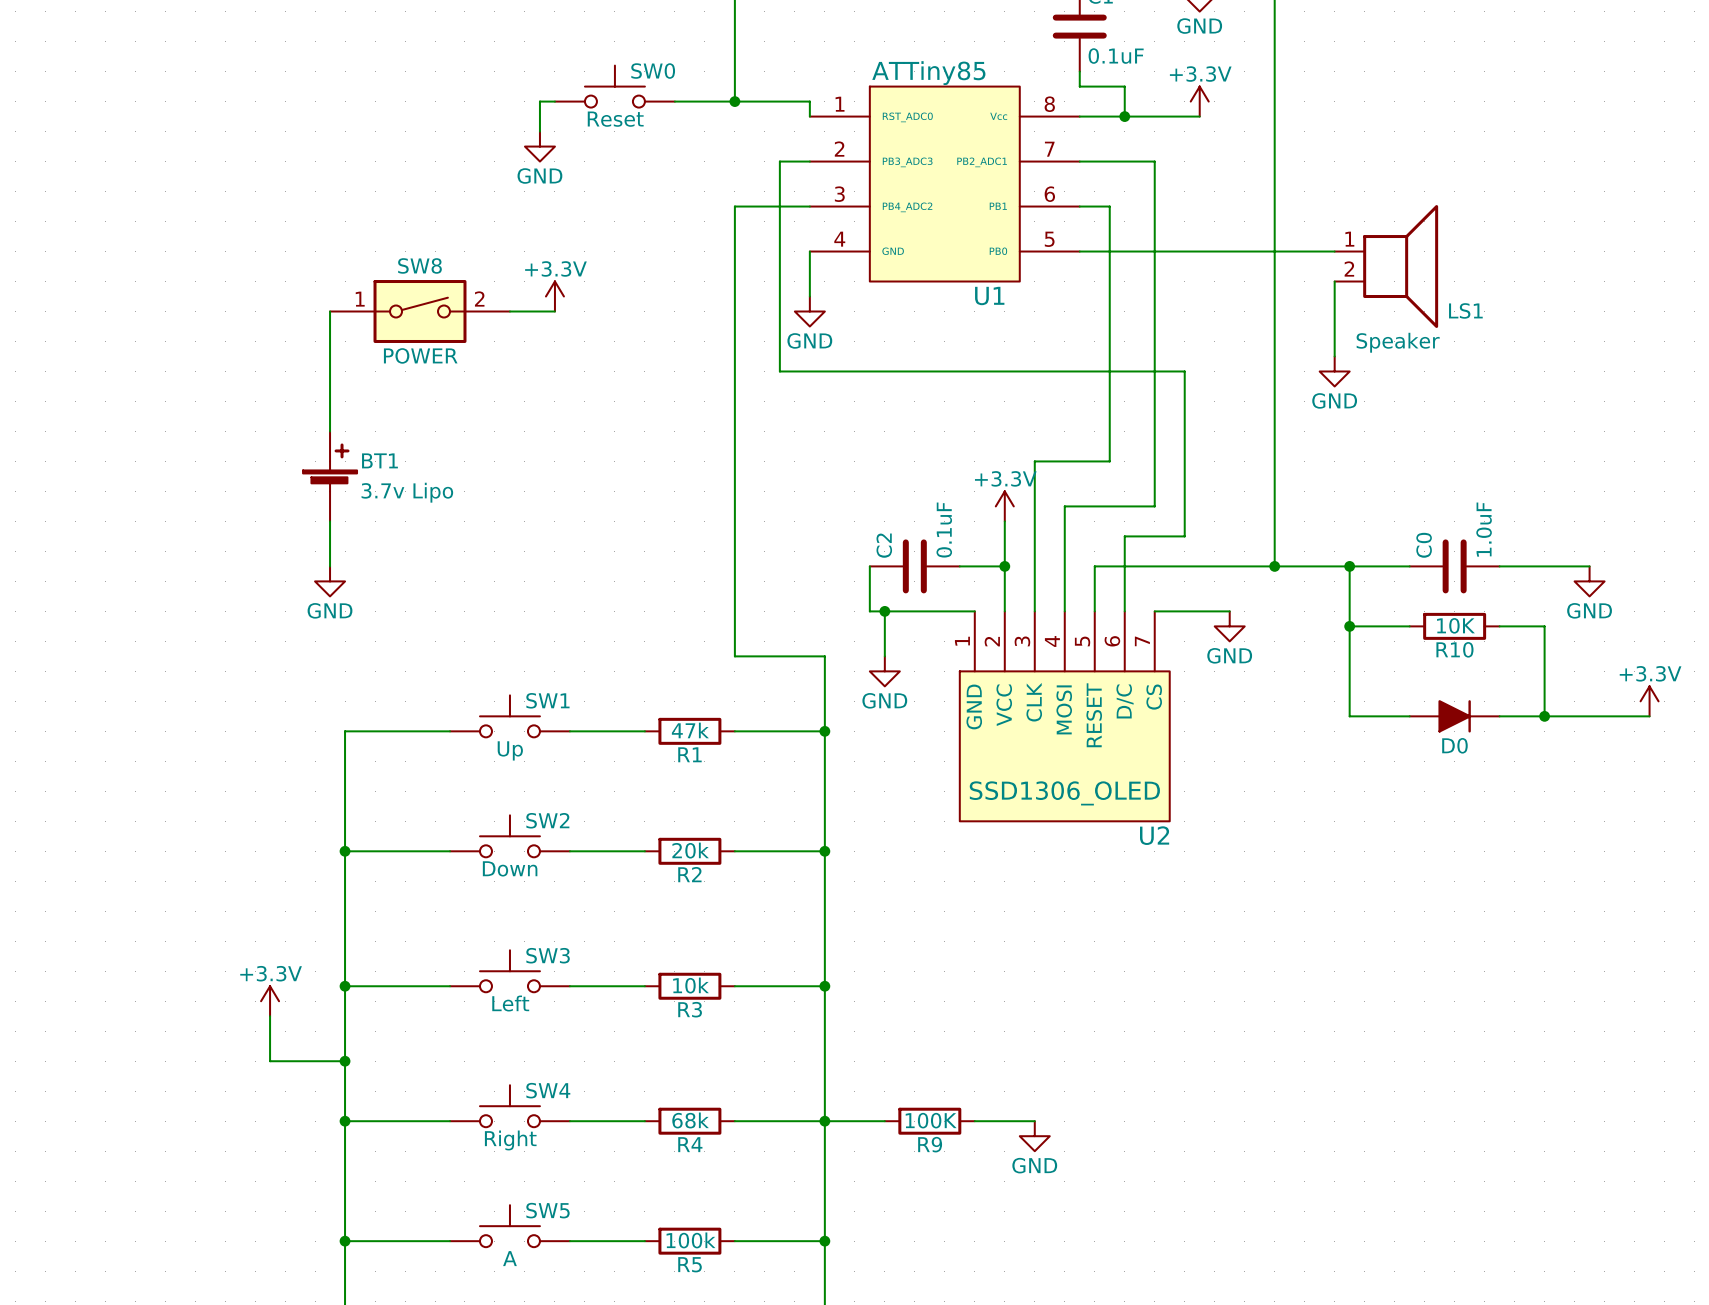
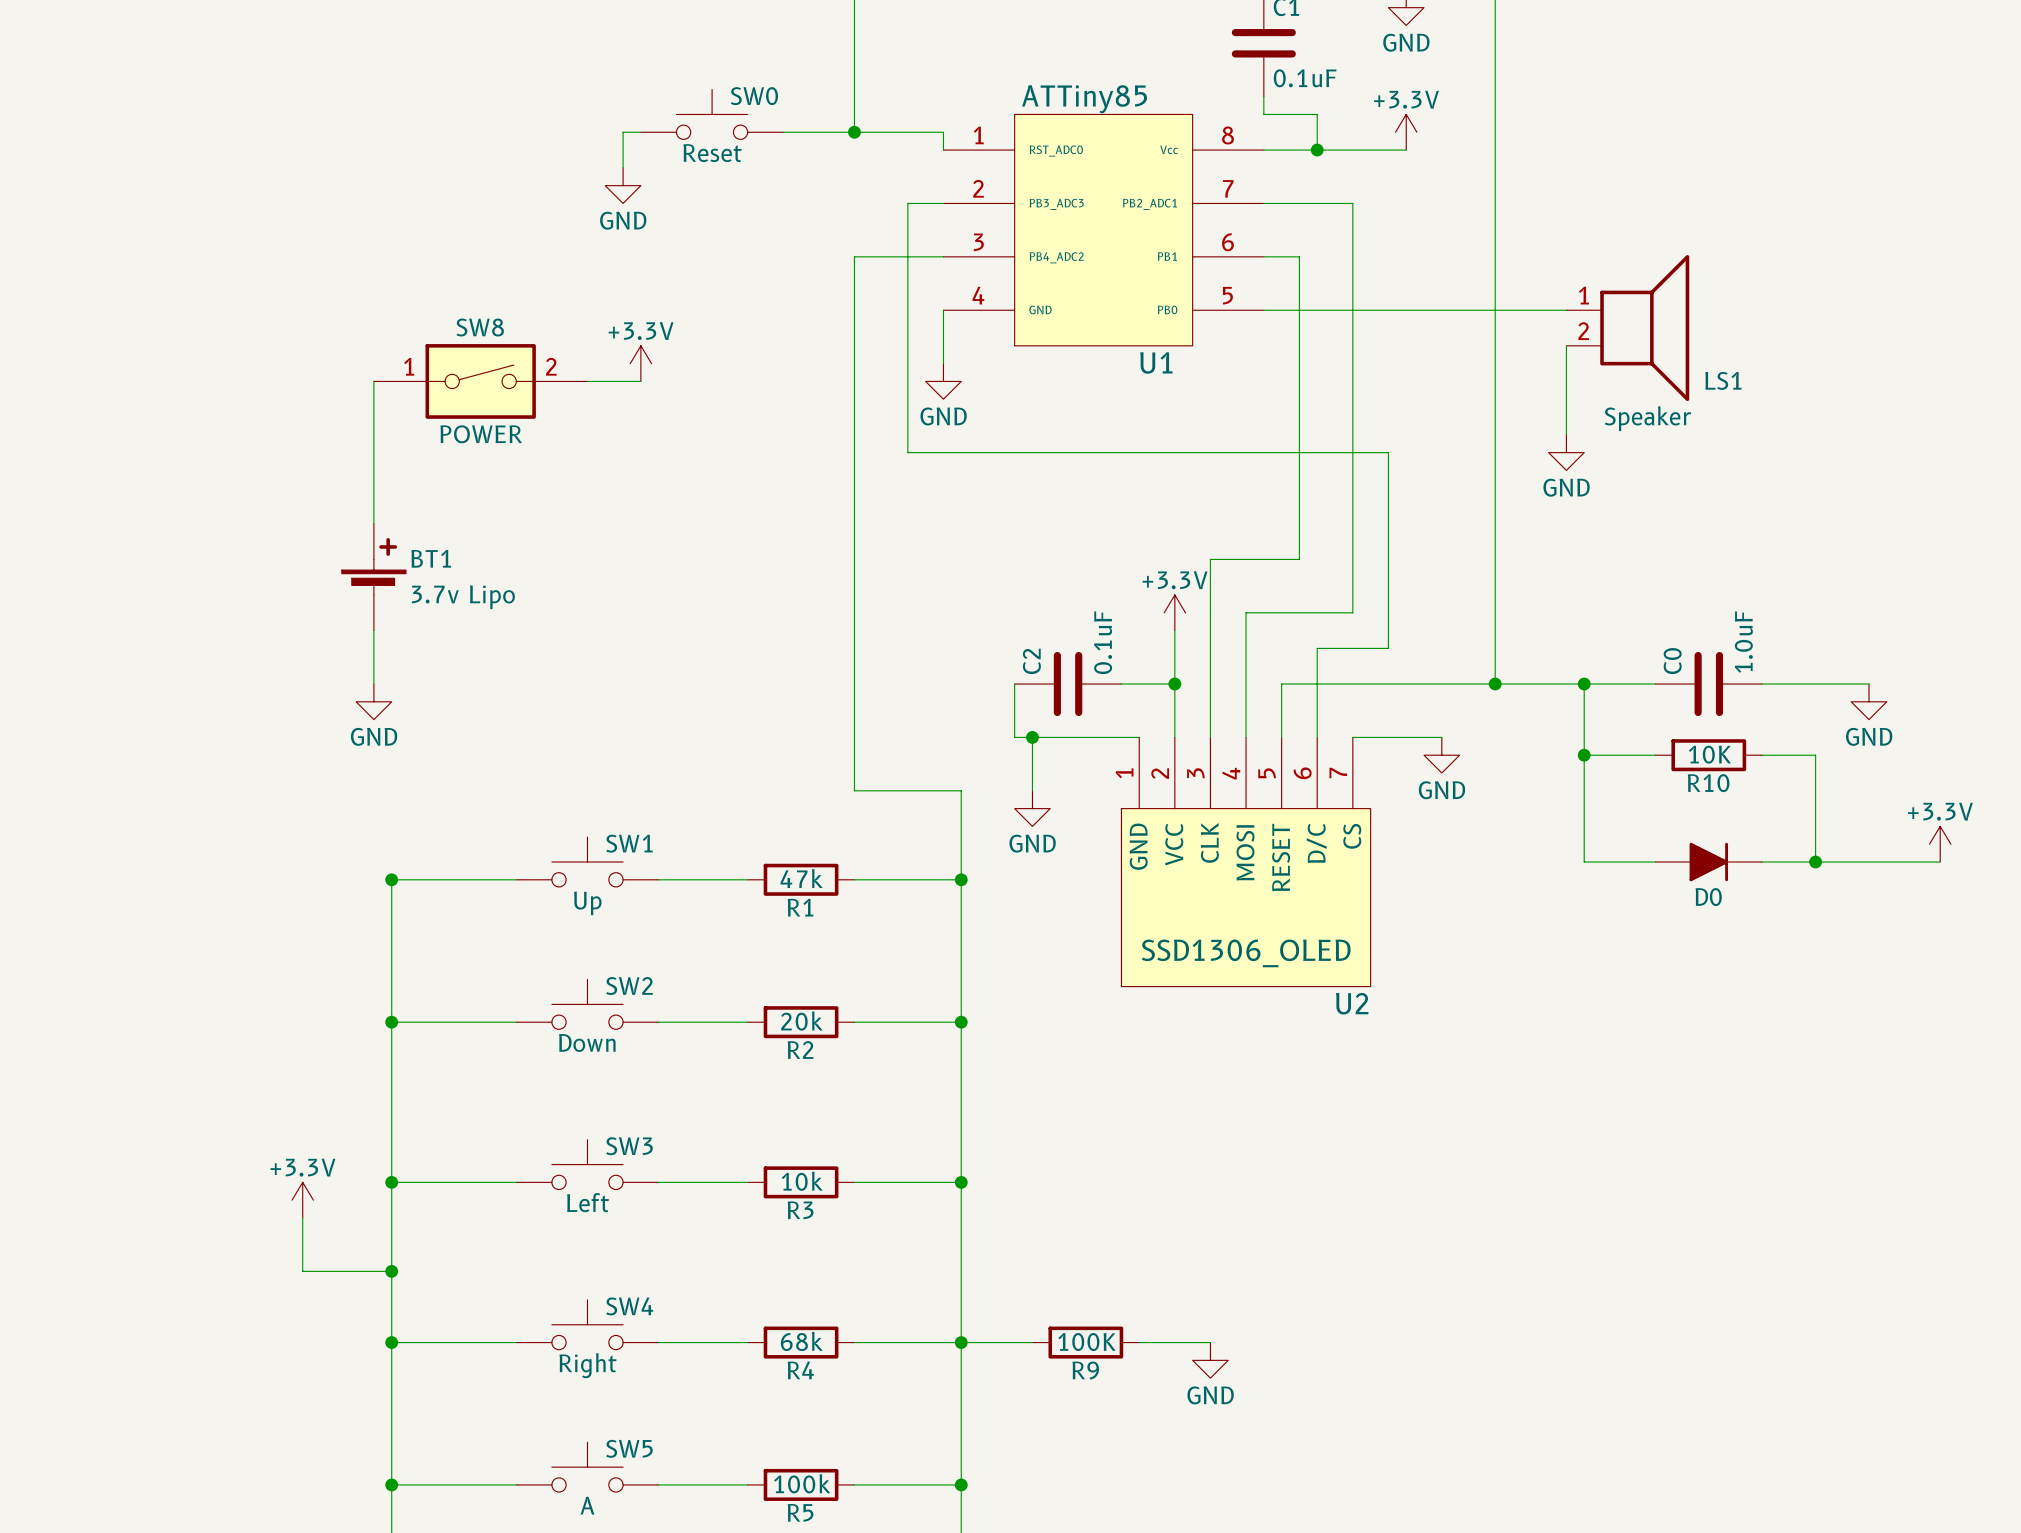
junction: none -> (391, 879)

